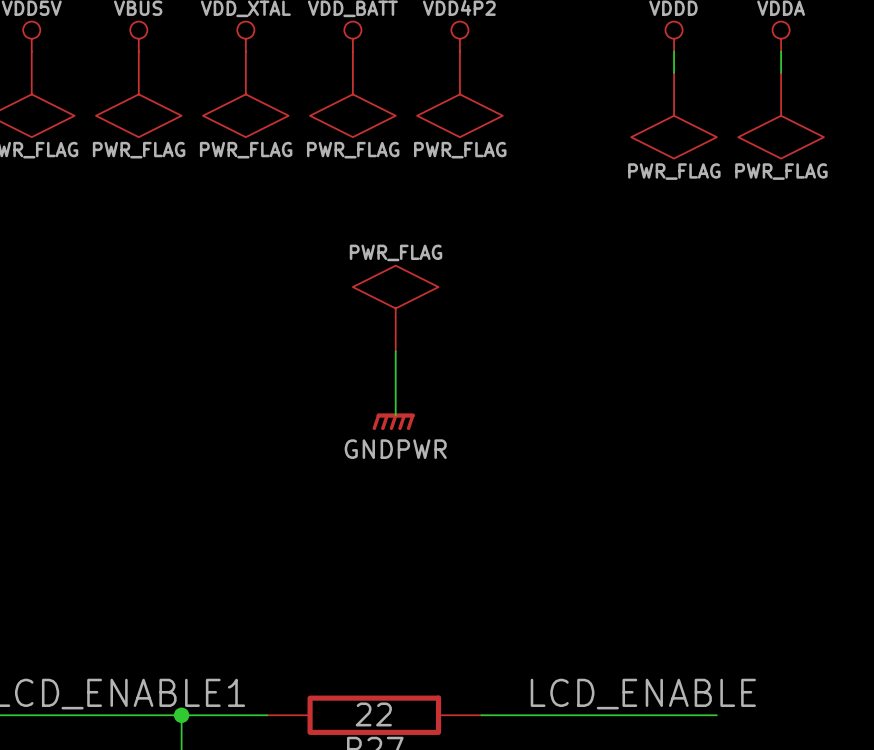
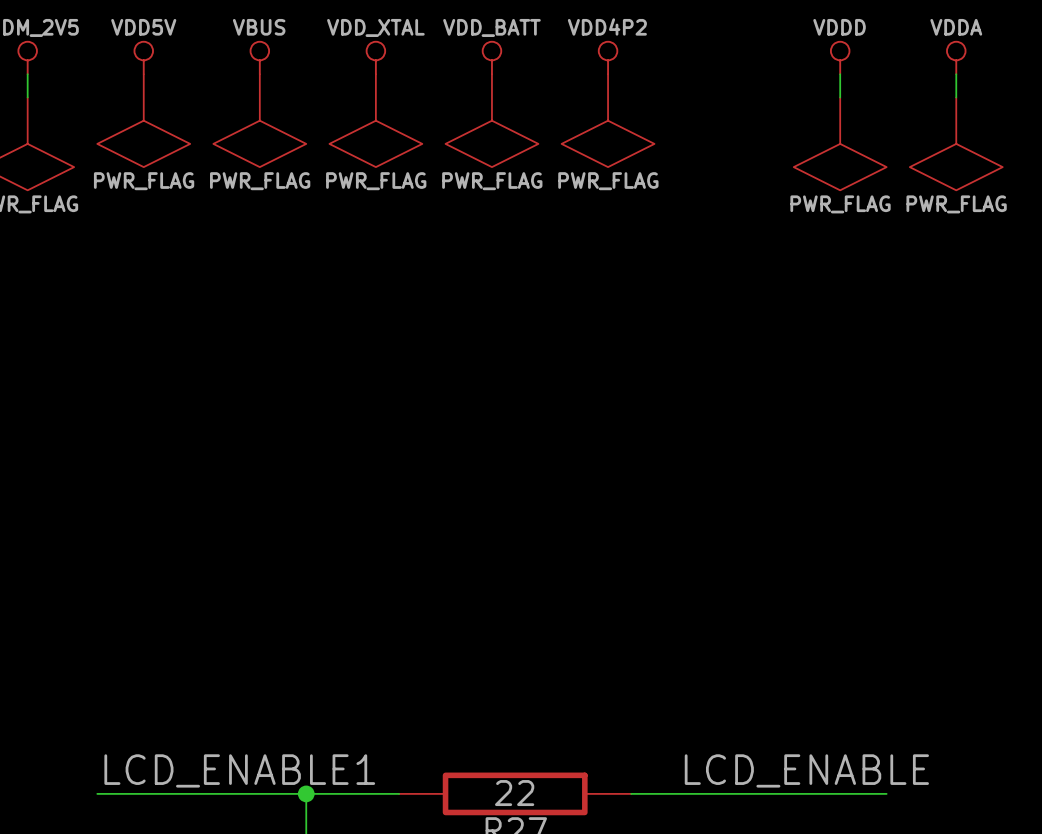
power symbol: PWR_FLAG (395, 308) -> none
wire: (395, 351) (395, 415) -> none
power symbol: GNDPWR (393, 421) -> none

